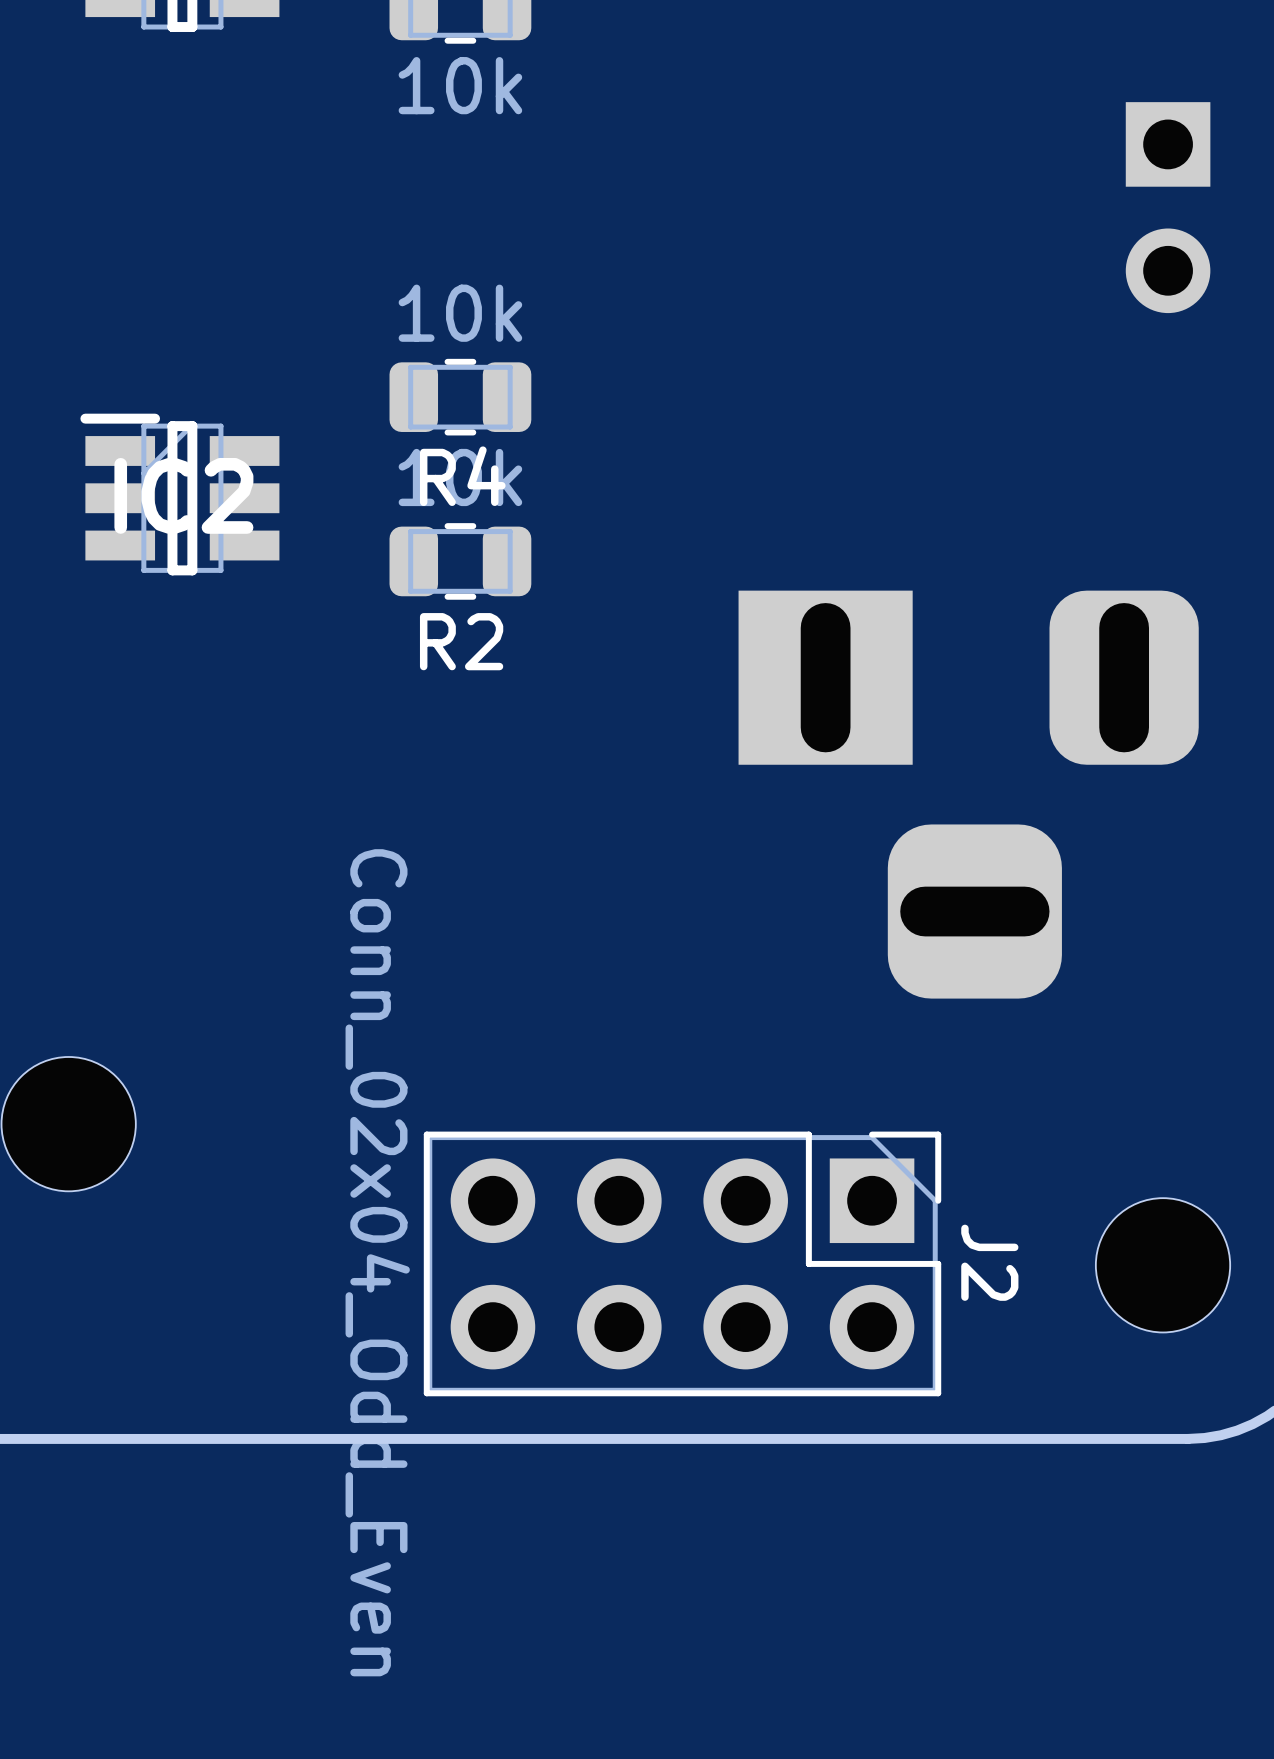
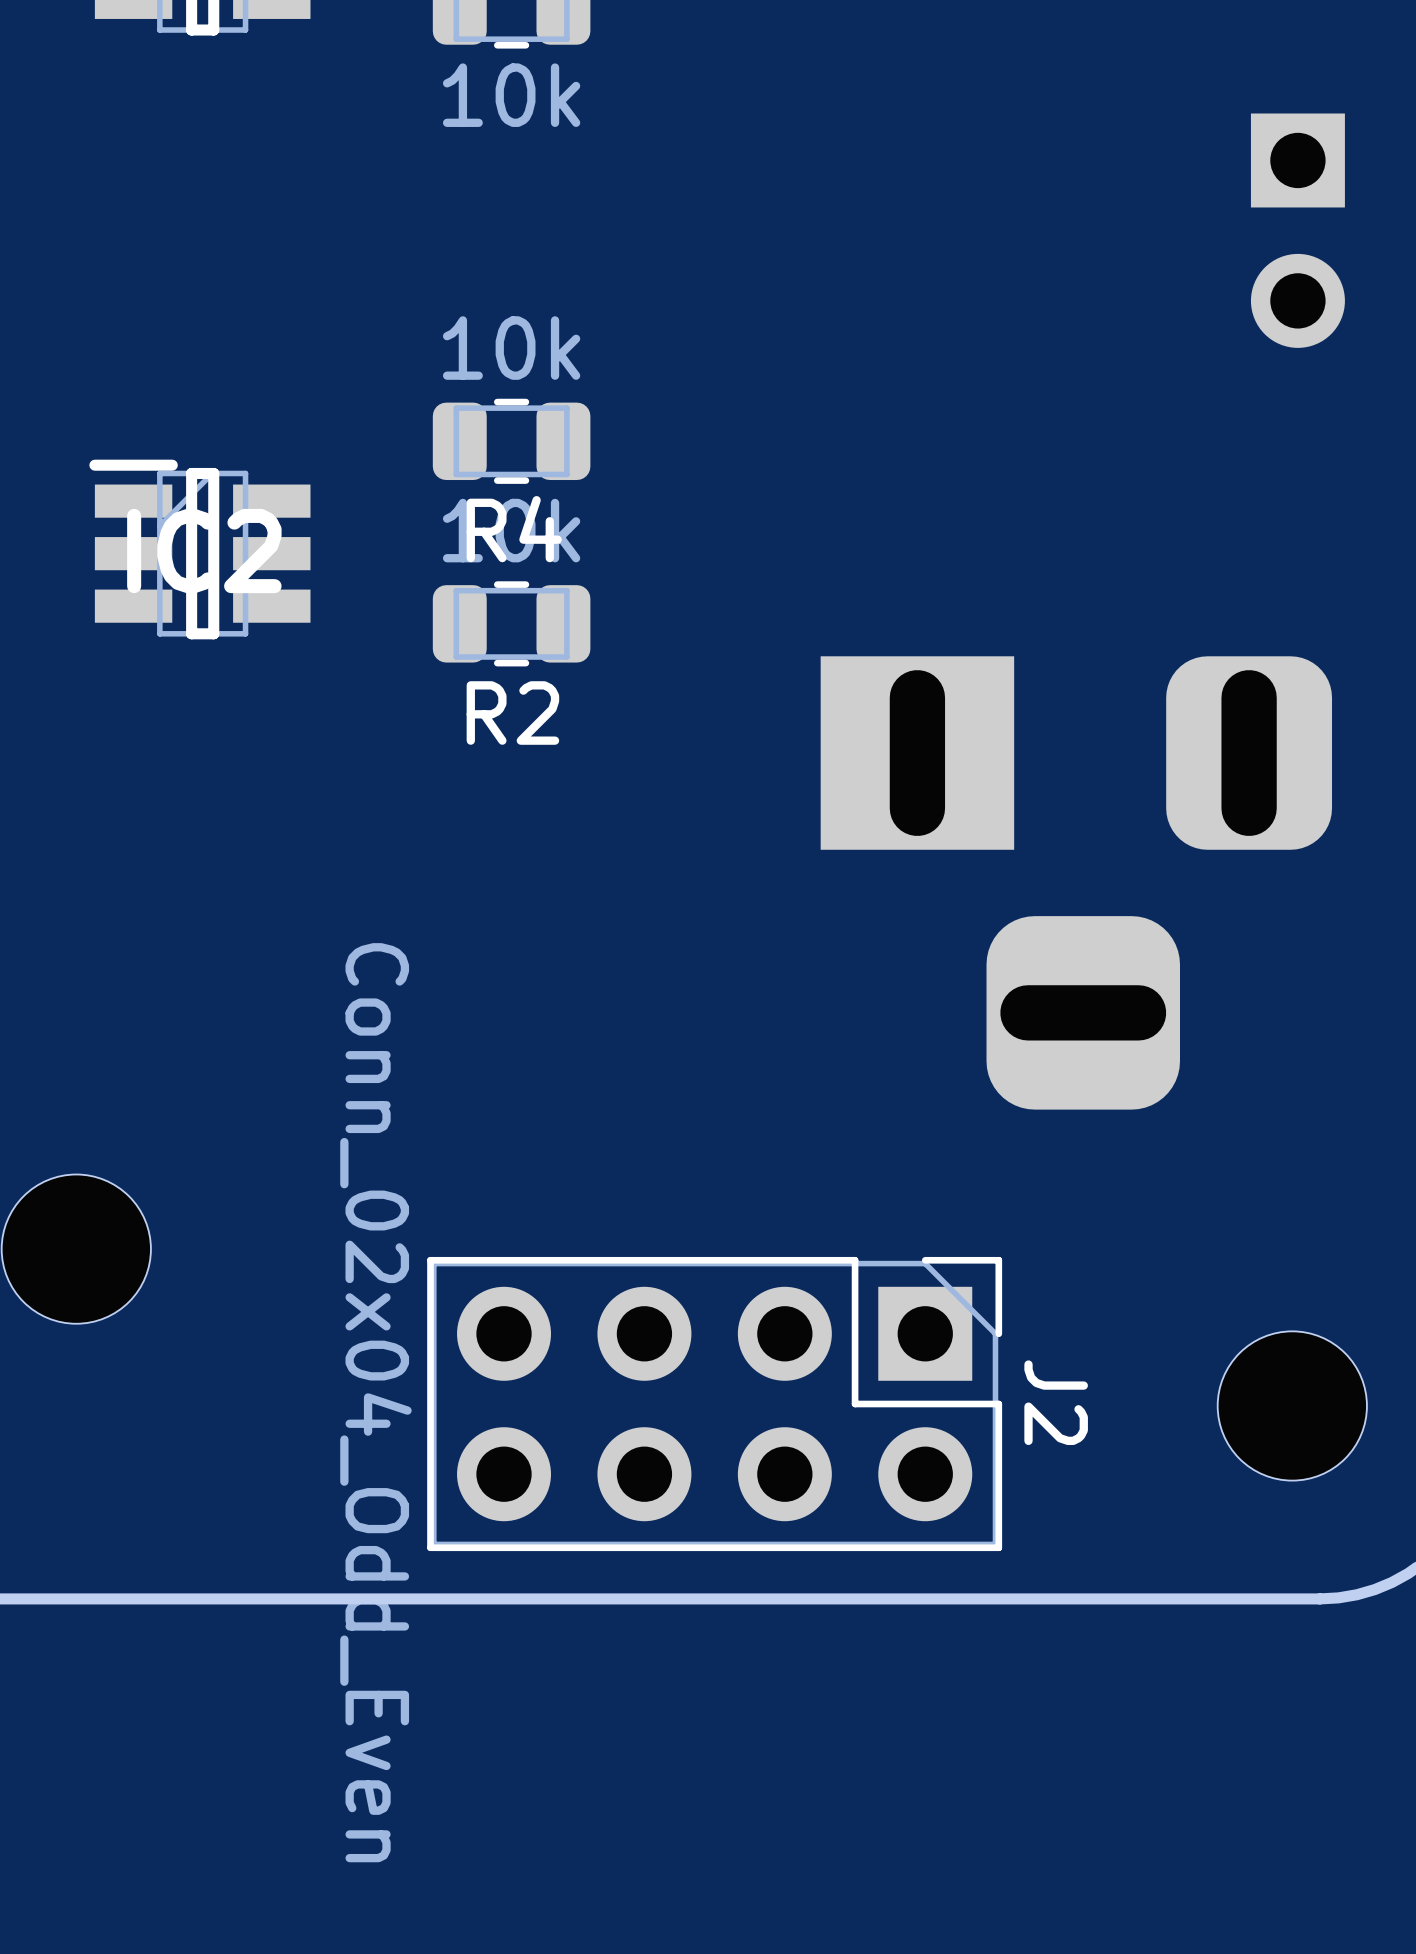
J2 position: (682, 1263) -> (714, 1404)

